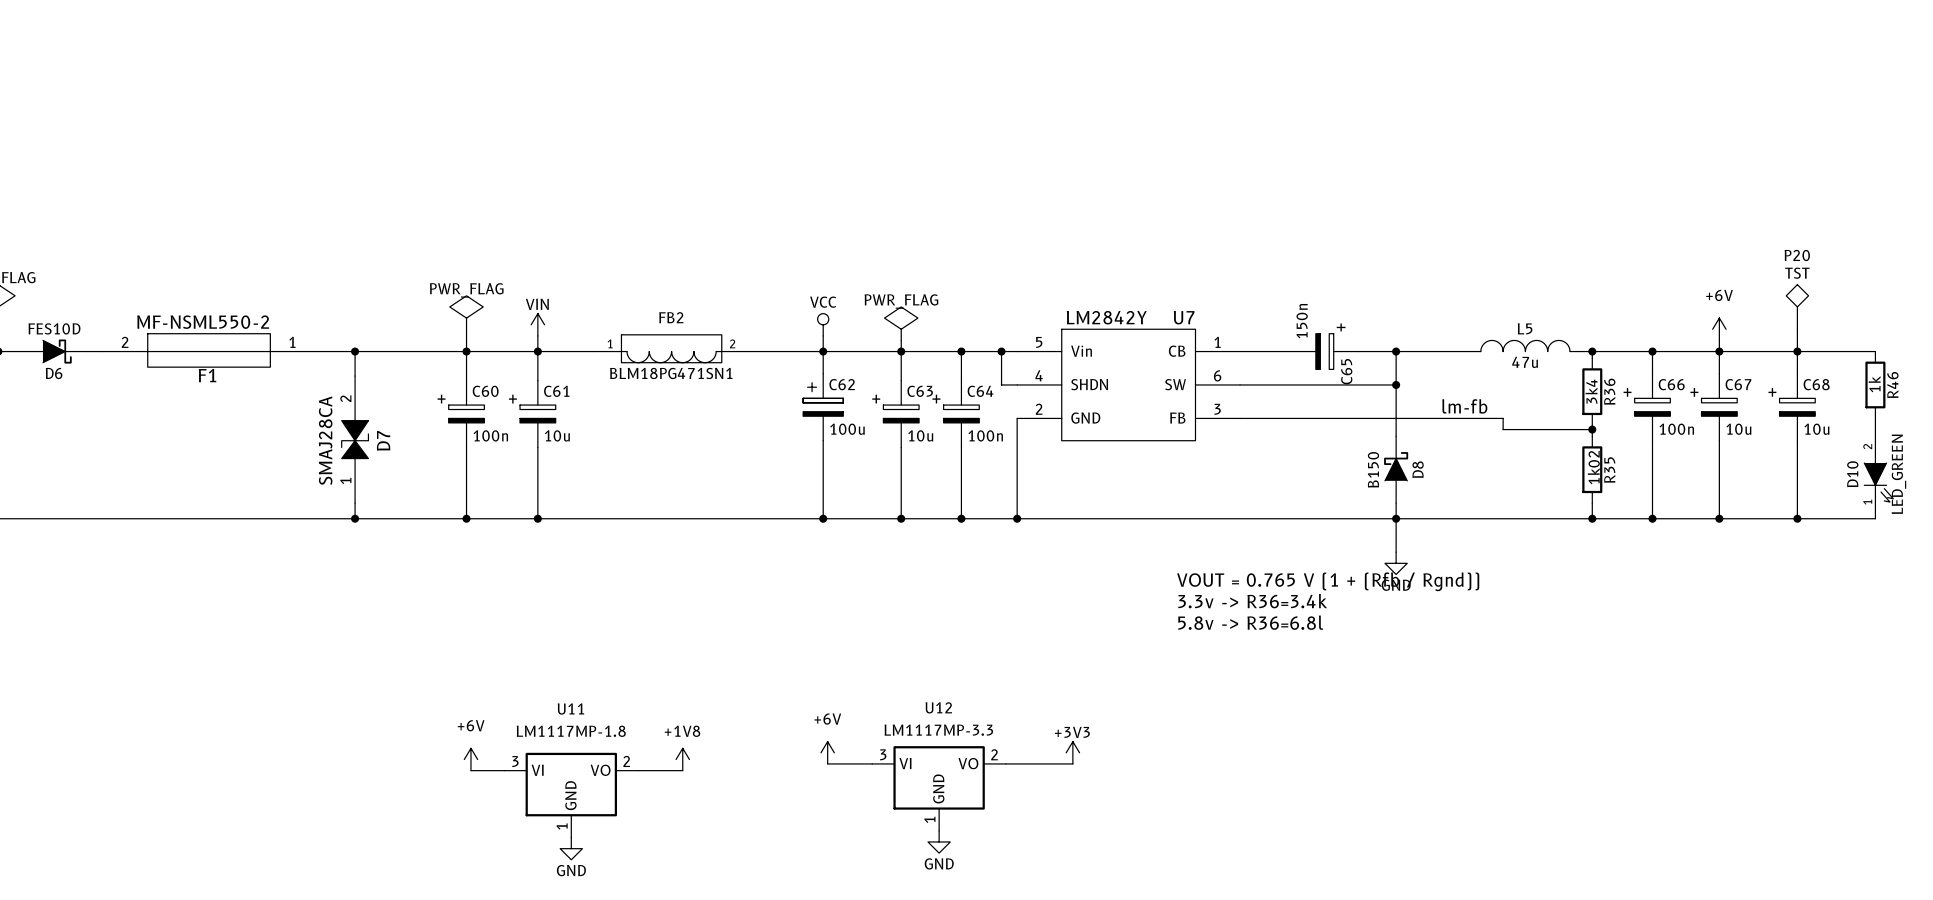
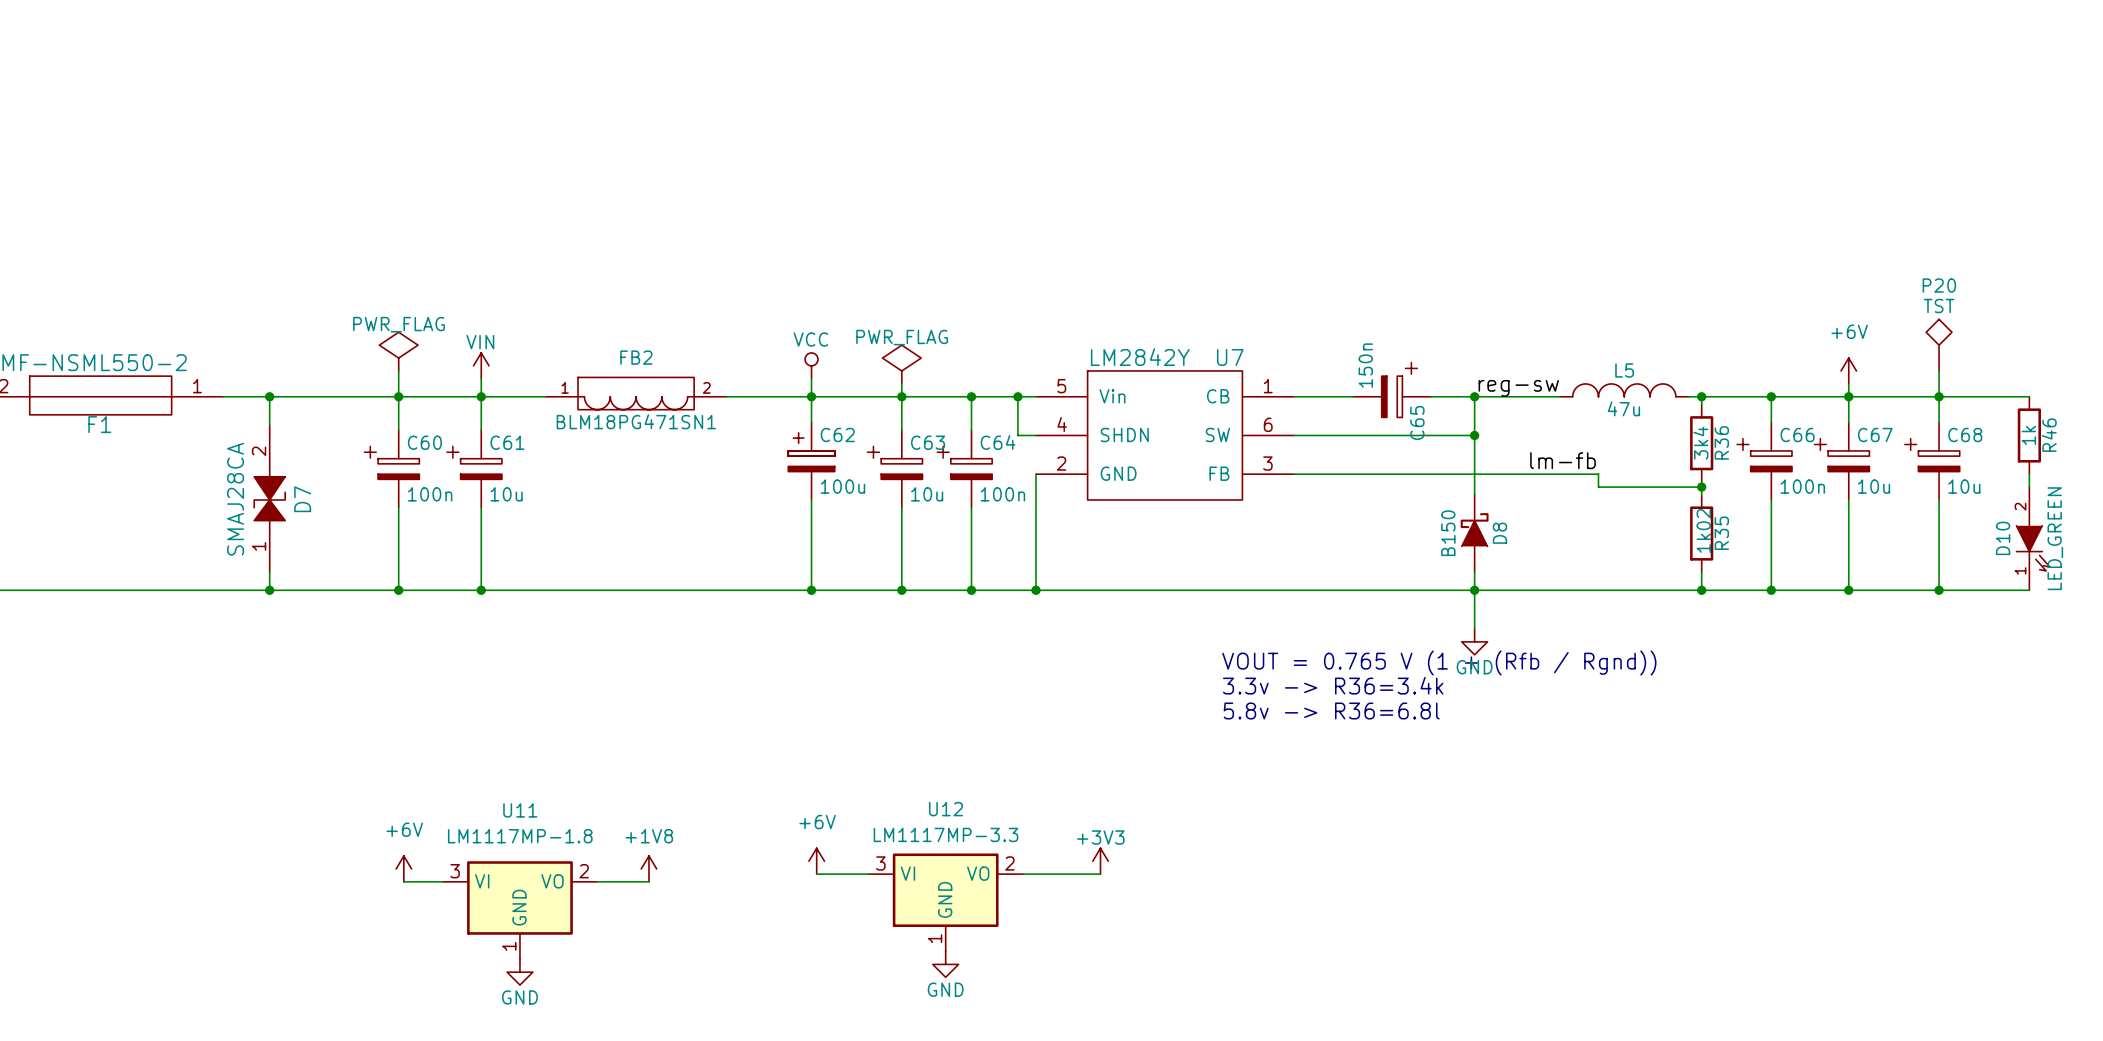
label: none -> reg-sw (1518, 388)

